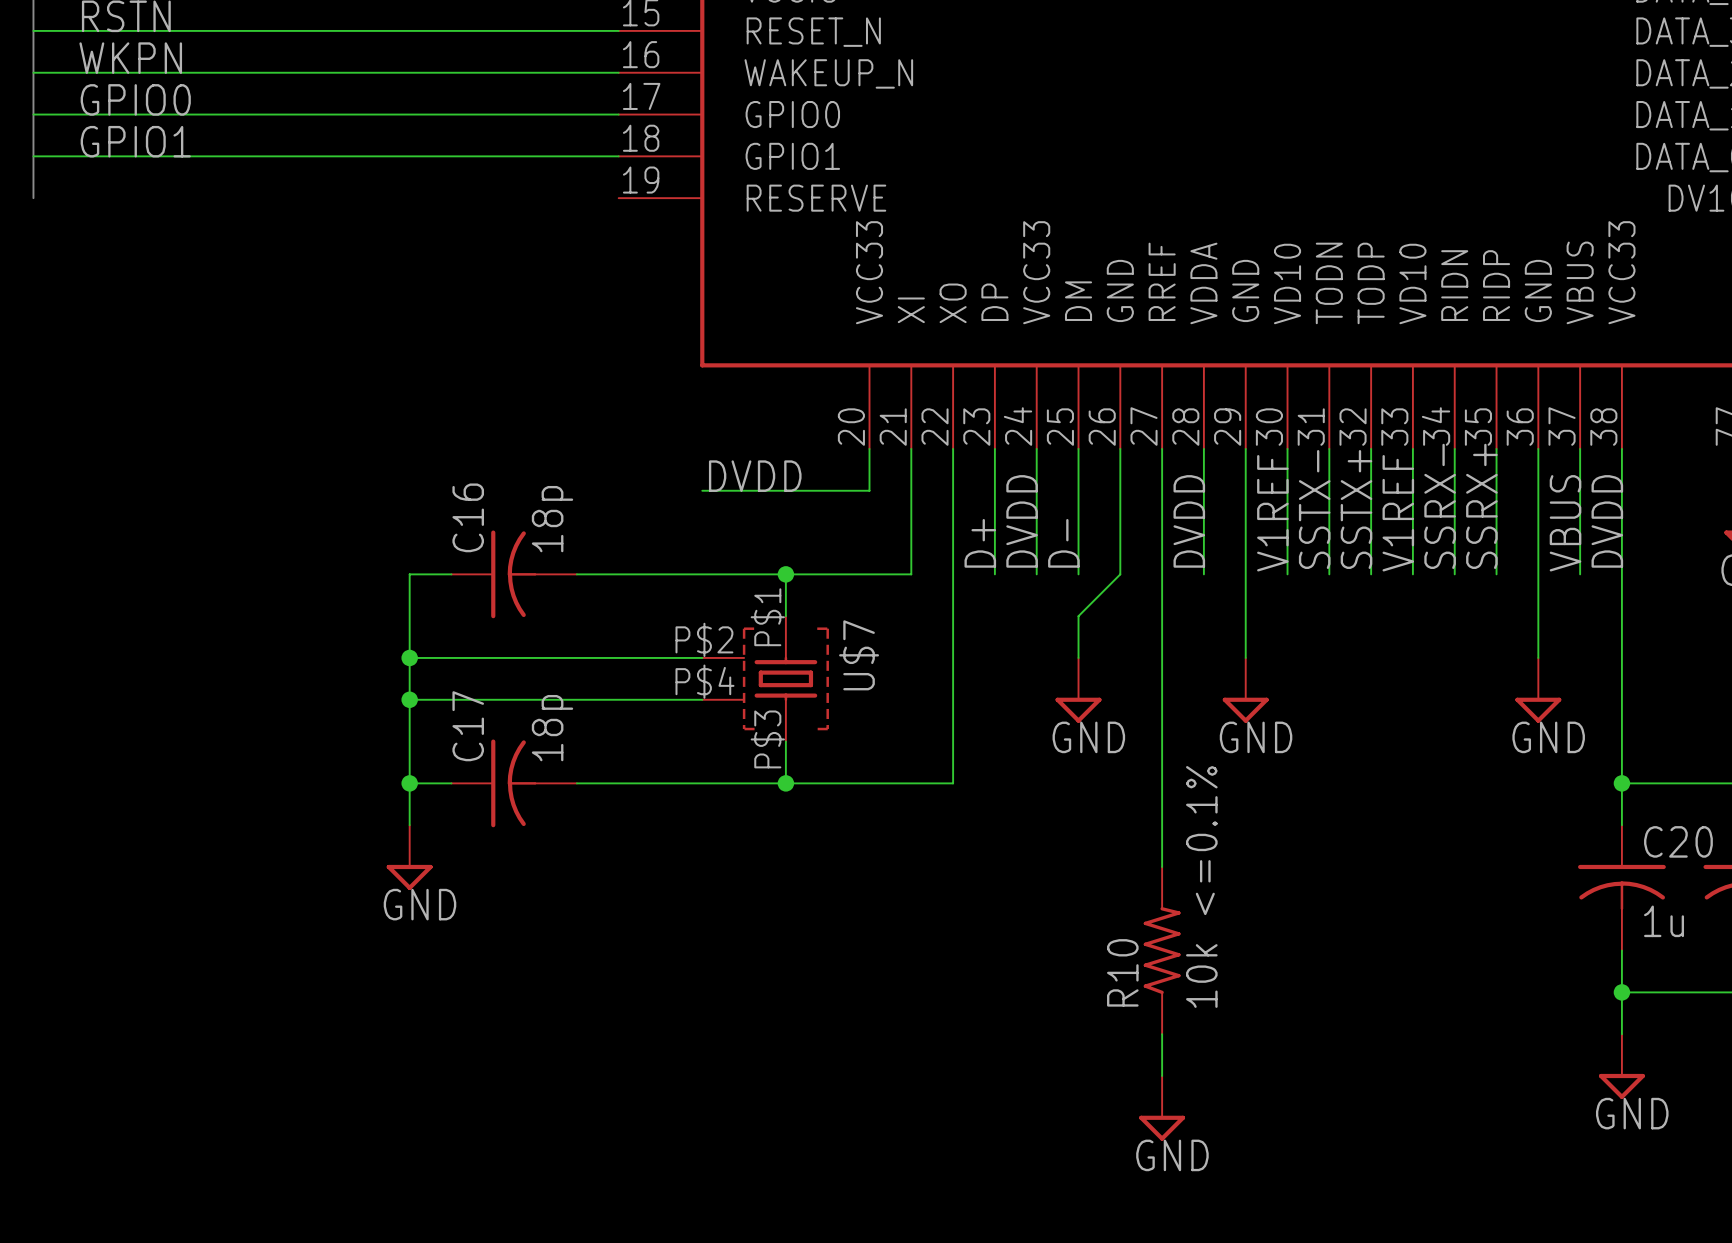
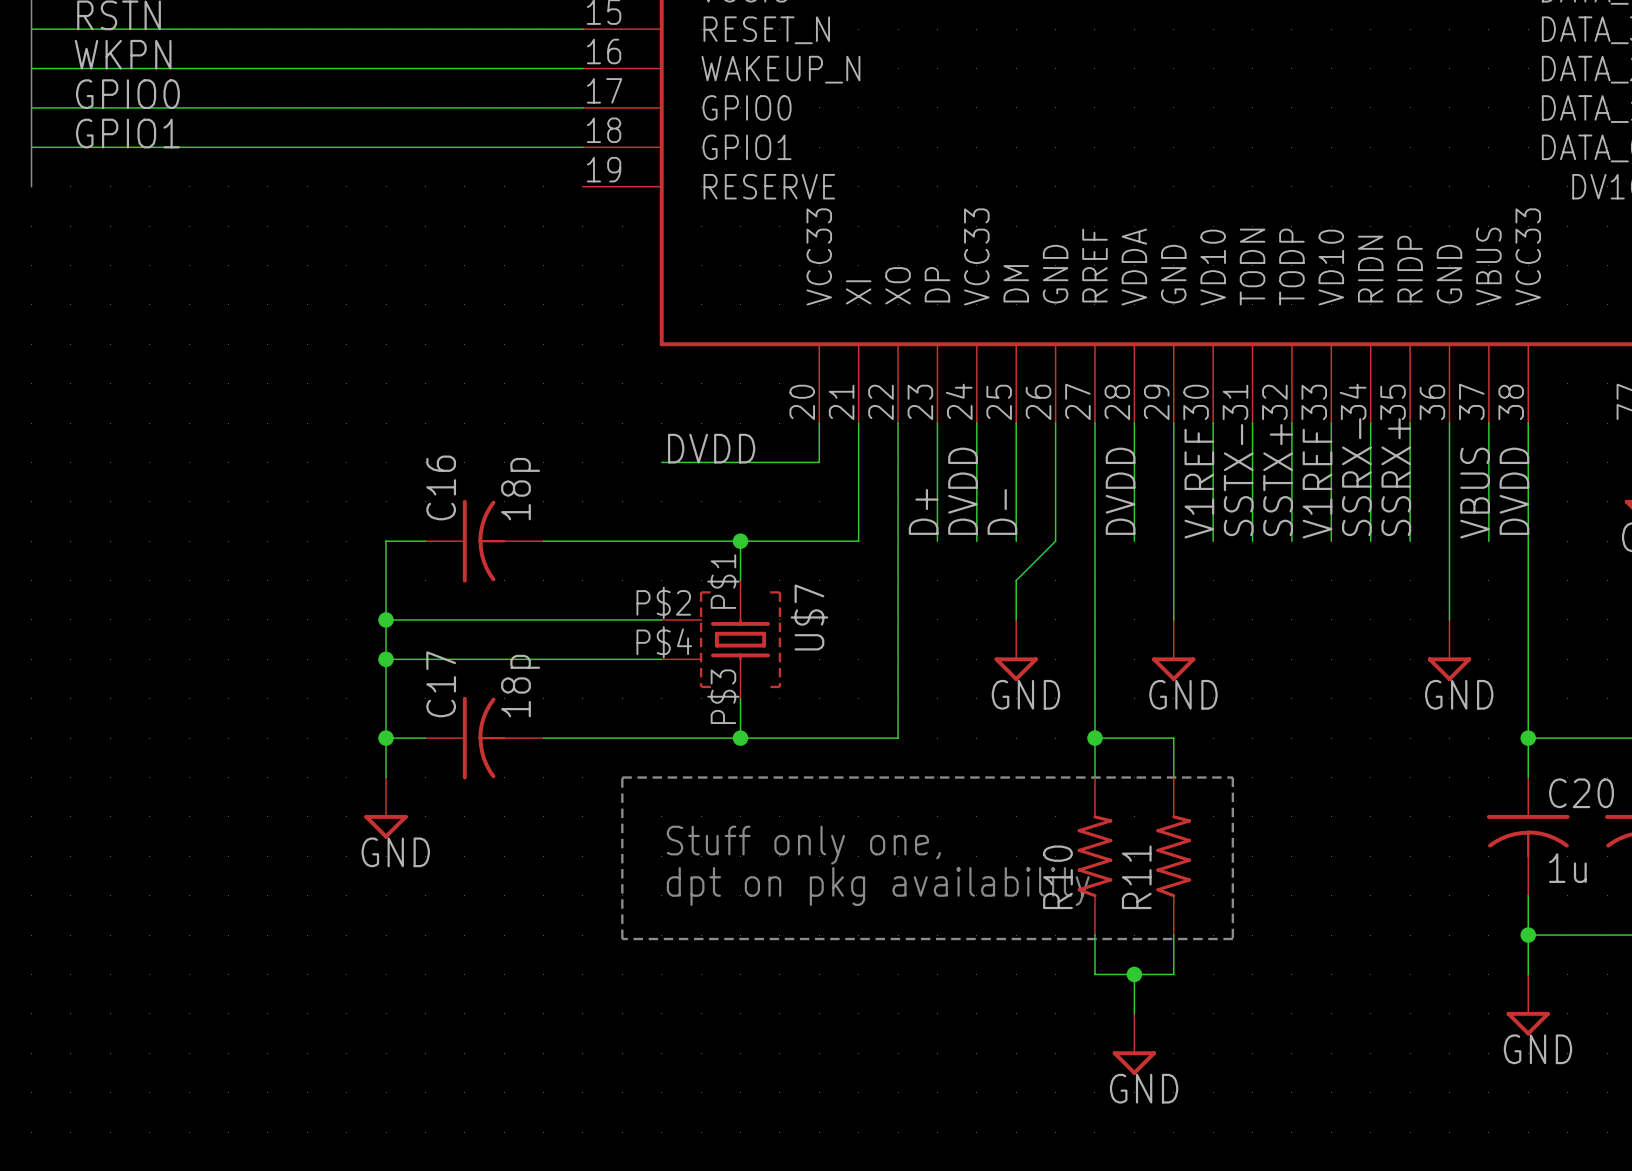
wire: none -> (1094, 738) (1173, 738) (1173, 777)
junction: none -> (1094, 738)
line: none -> (622, 777) (1232, 777) (1232, 939) (622, 939) (622, 777)
R10 value: 10k <=0.1% (1201, 886) -> none
text: none -> Stuff only one, (803, 845)
R11: none -> (1173, 856)
text: none -> dpt on pkg availability (878, 886)
R10 position: (1162, 950) -> (1094, 856)
wire: none -> (1094, 935) (1094, 974) (1173, 974) (1173, 935)
wire: (1162, 1034) (1162, 1075) -> (1134, 974) (1134, 1013)
junction: none -> (1134, 974)
power symbol position: GND (1162, 1108) -> GND (1134, 1044)

